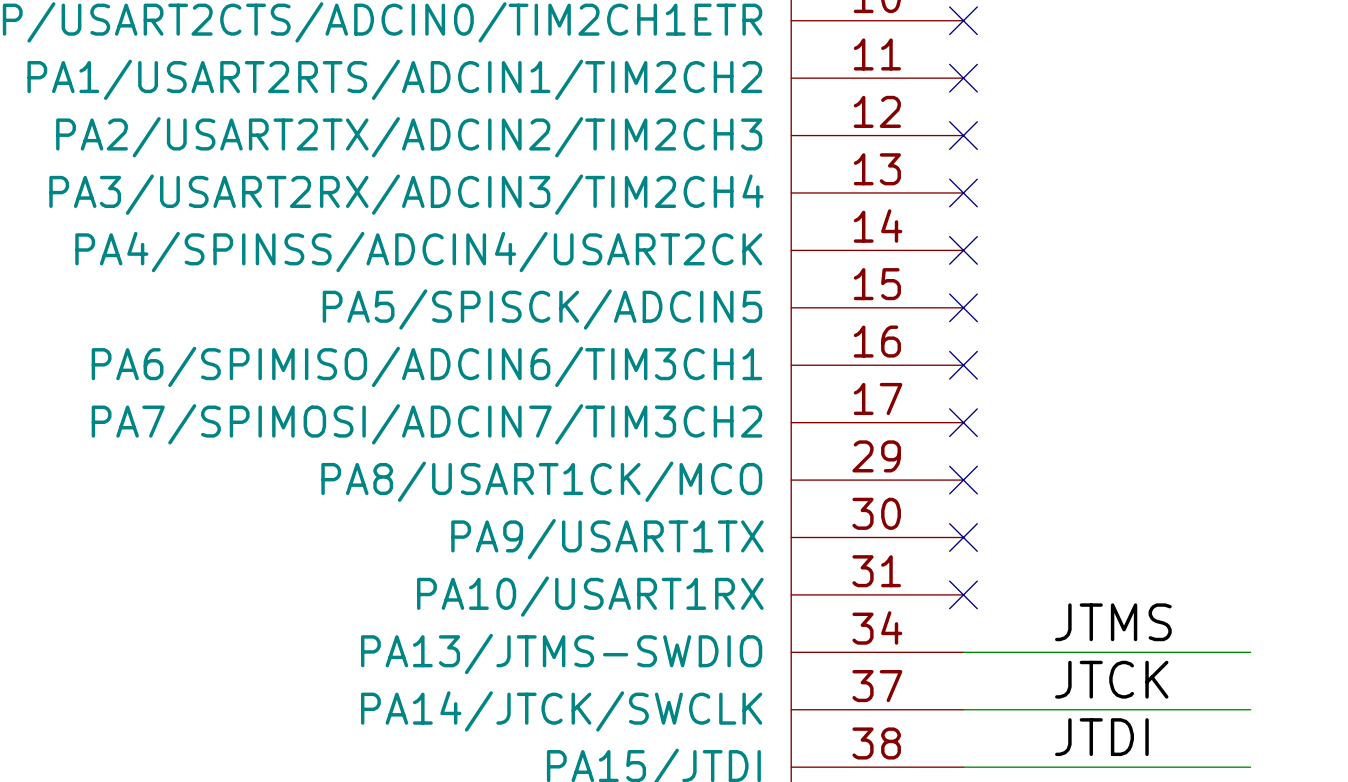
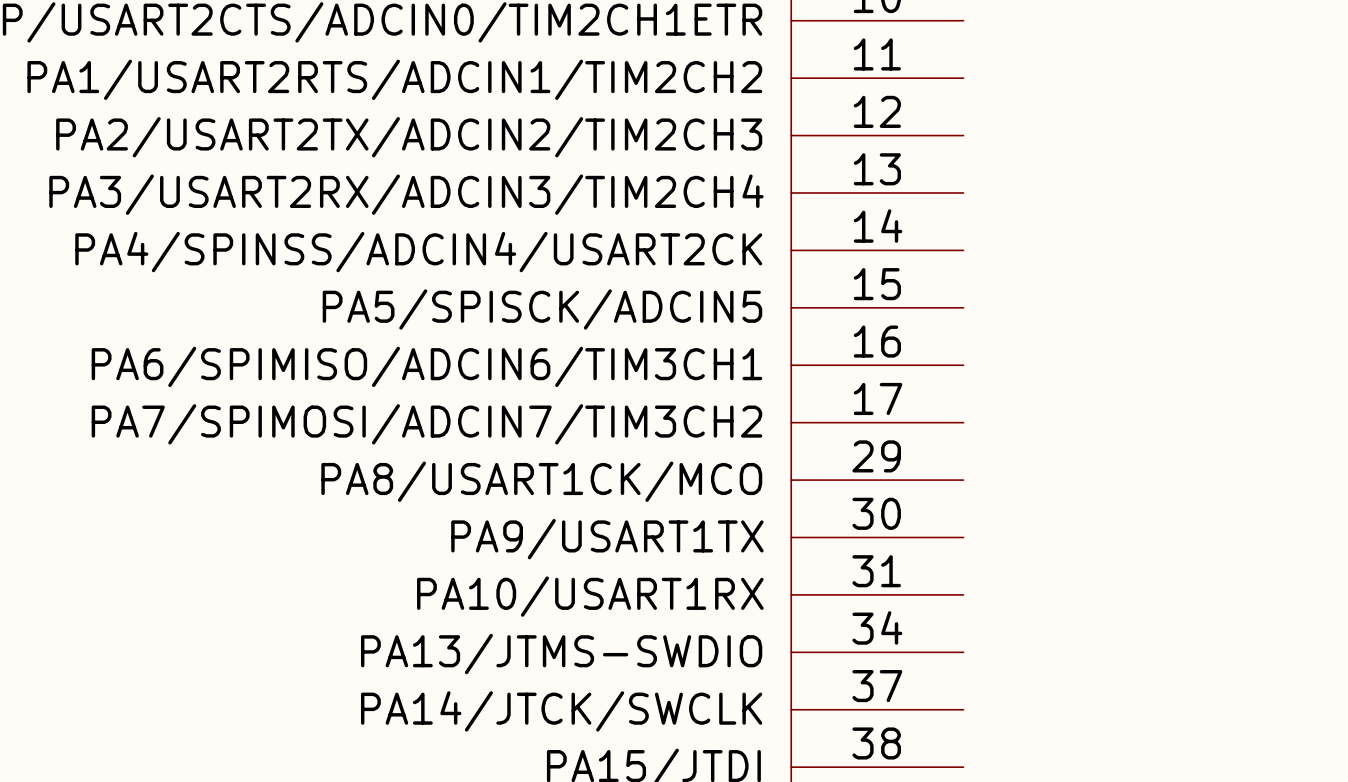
no-connect mark: (963, 20) -> none
no-connect mark: (963, 78) -> none
no-connect mark: (963, 135) -> none
no-connect mark: (963, 192) -> none
no-connect mark: (963, 250) -> none
no-connect mark: (963, 307) -> none
no-connect mark: (963, 365) -> none
no-connect mark: (963, 422) -> none
no-connect mark: (963, 480) -> none
no-connect mark: (963, 537) -> none
no-connect mark: (963, 594) -> none
label: JTMS (1113, 622) -> none
wire: (963, 652) (1250, 652) -> none
label: JTCK (1111, 679) -> none
wire: (963, 709) (1250, 709) -> none
label: JTDI (1101, 737) -> none
wire: (963, 767) (1250, 767) -> none

